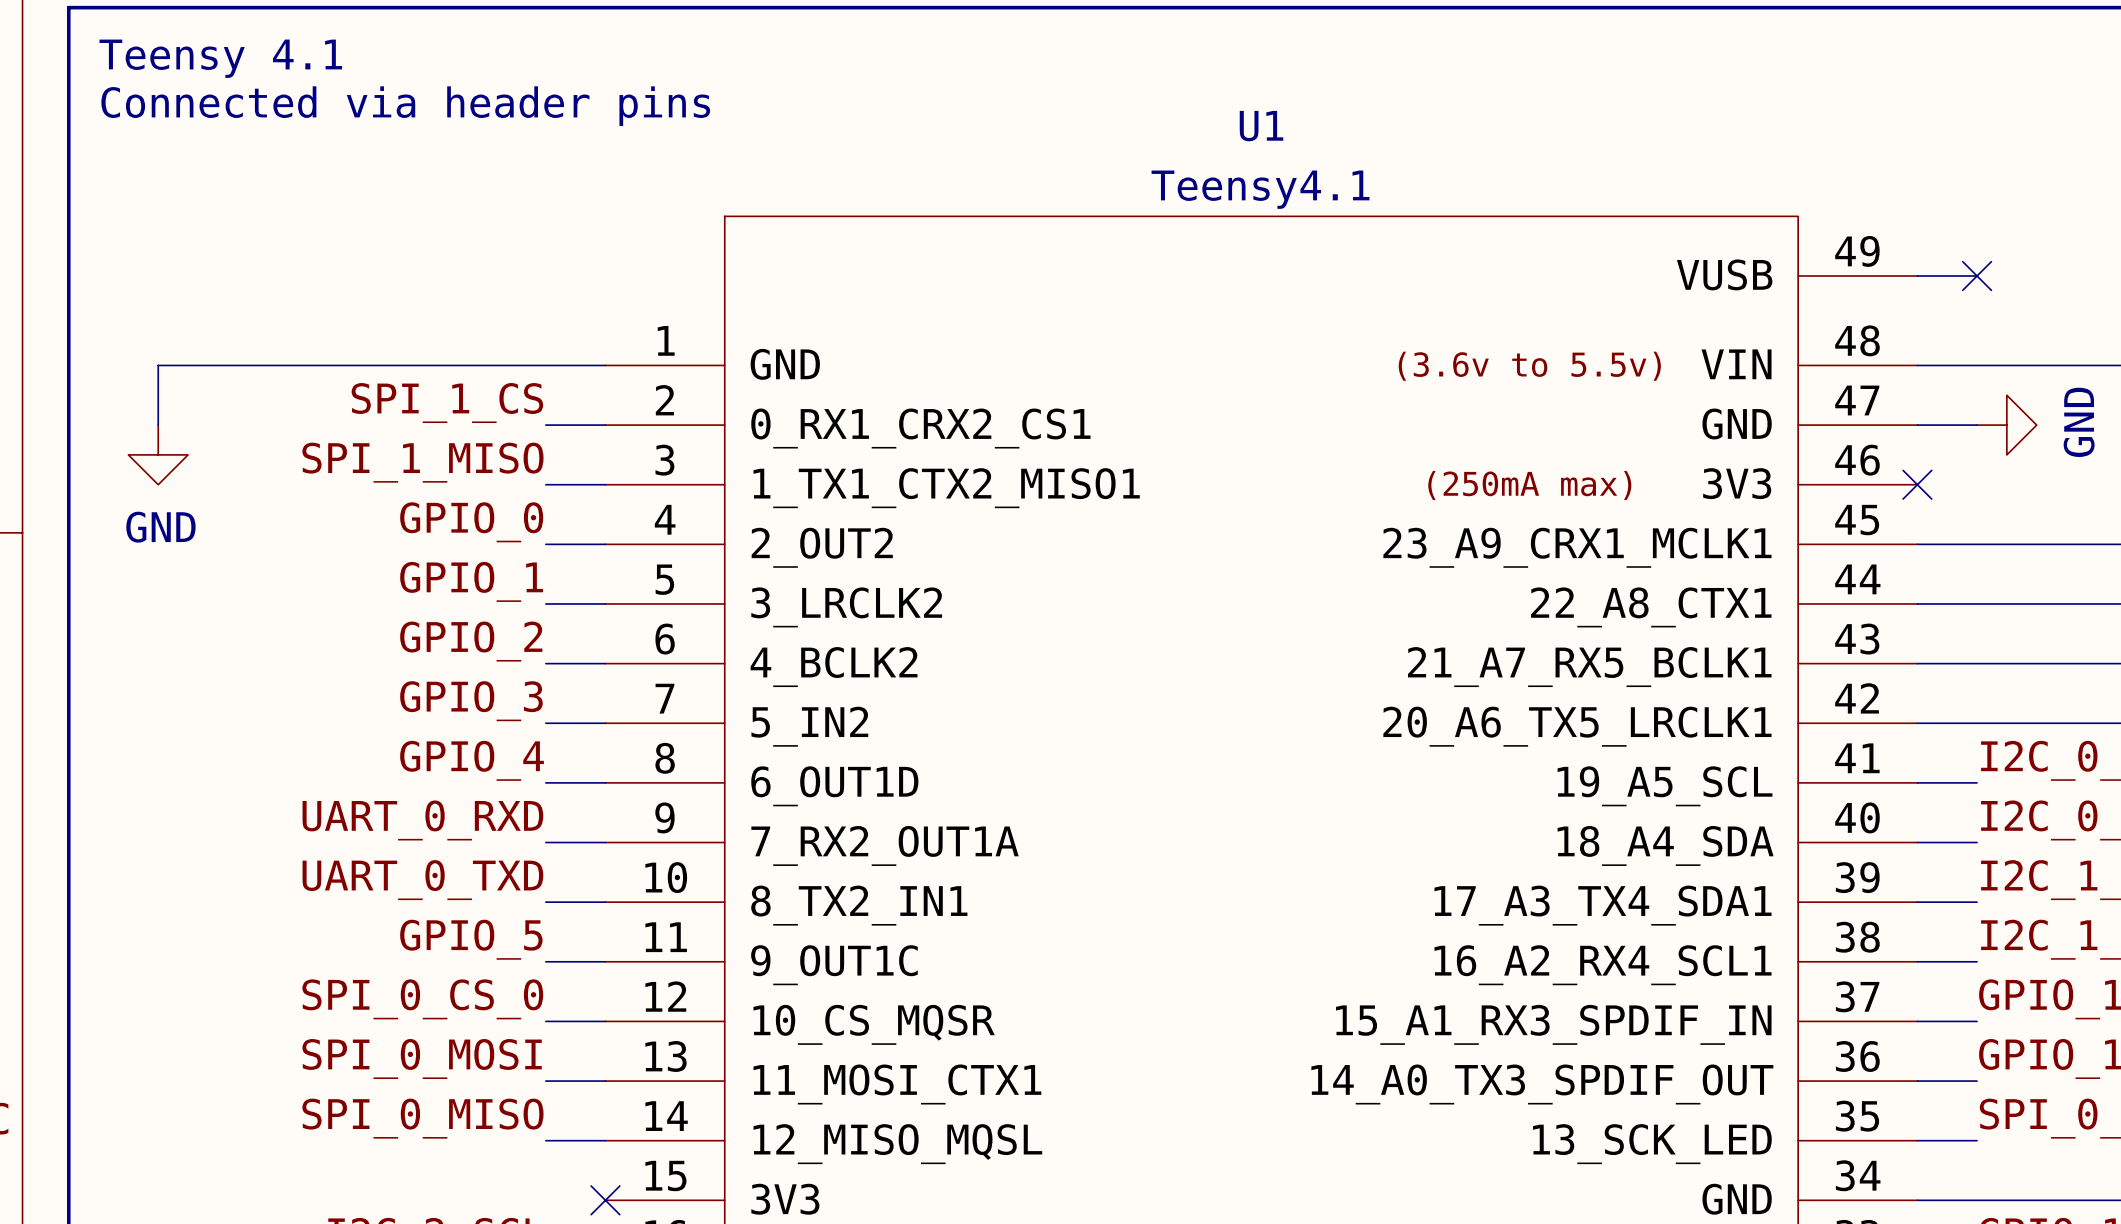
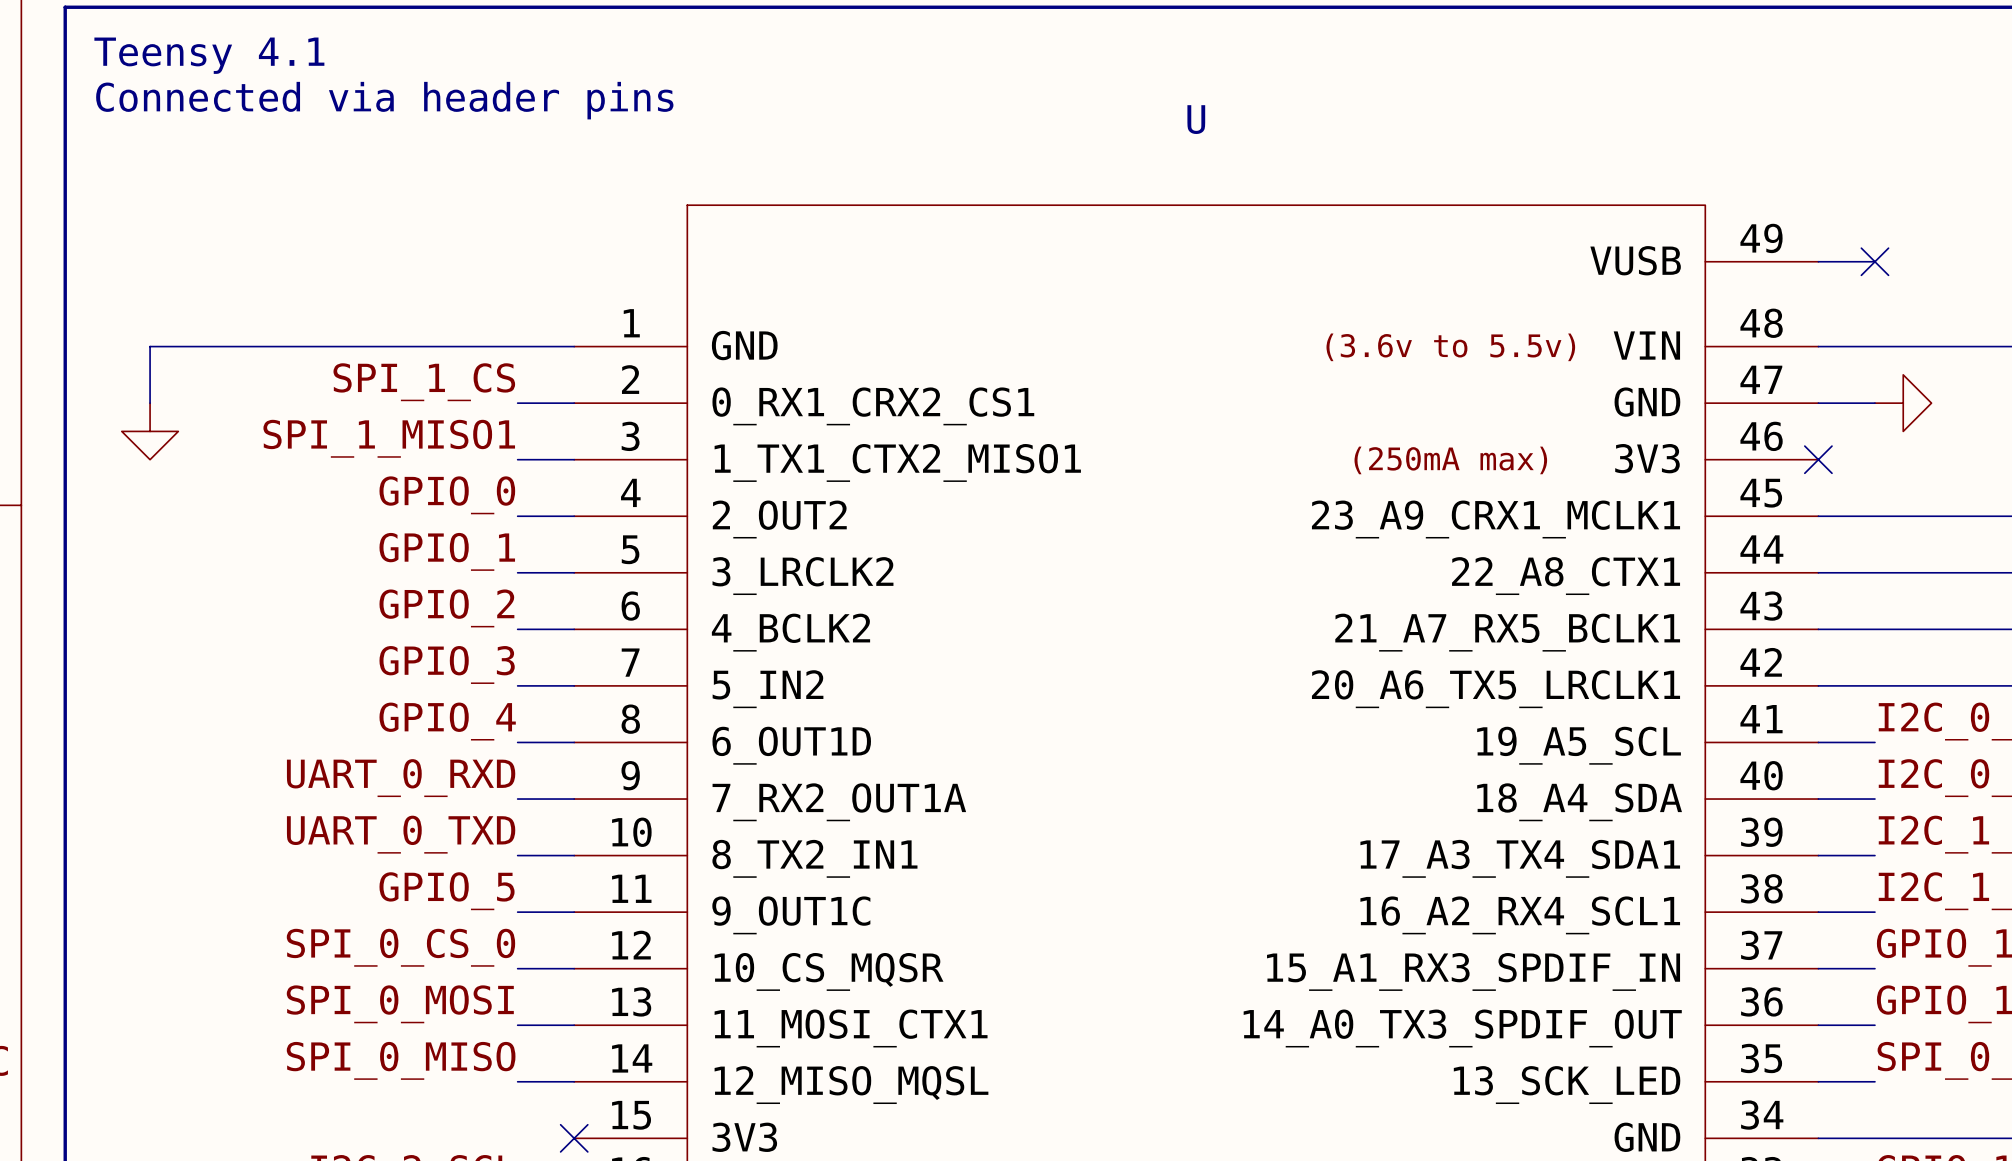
U1 name: U1 (1261, 126) -> U (1196, 119)
U1 value: Teensy4.1 (1260, 189) -> none
power symbol text: GND (2079, 422) -> none
label: SPI_1_MISO (422, 462) -> SPI_1_MISO1 (389, 438)
power symbol text: GND (160, 527) -> none

